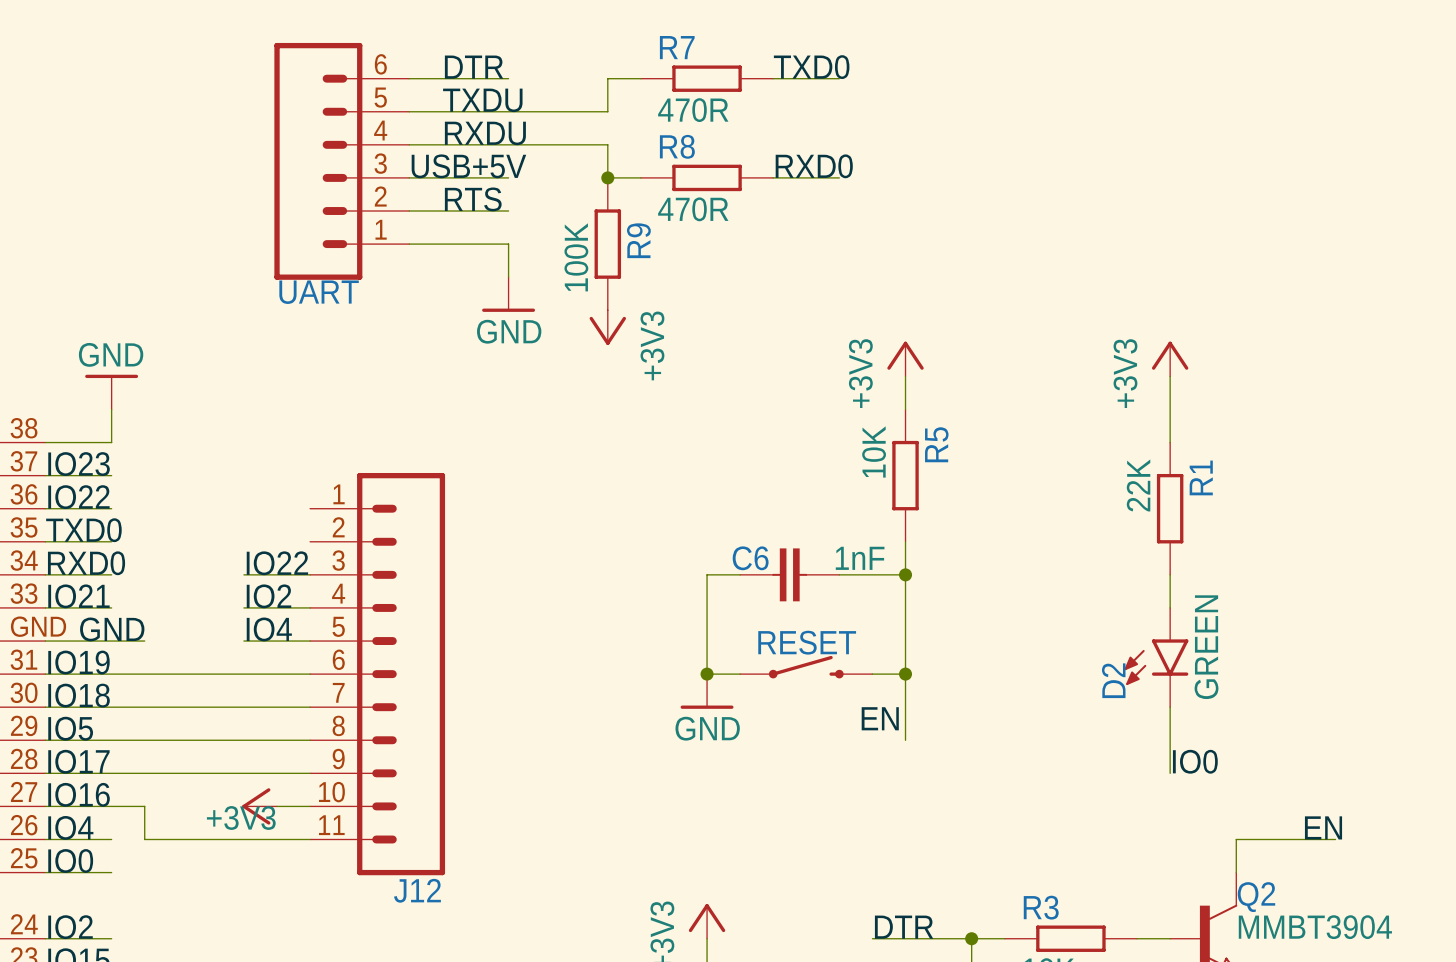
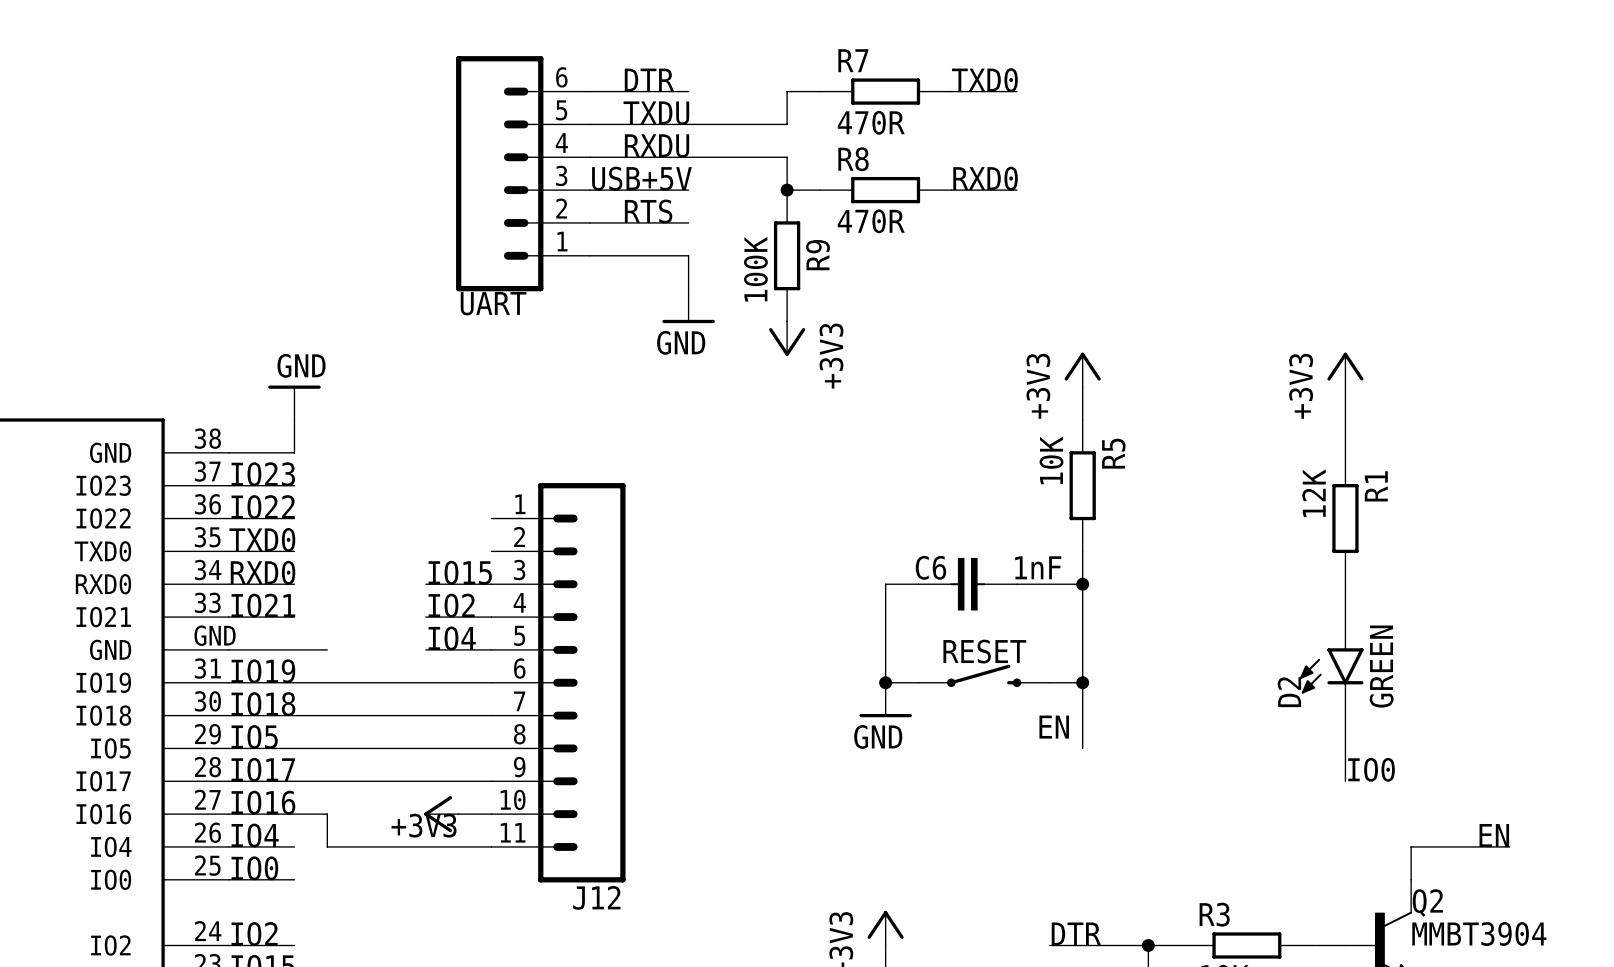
R1 value: 22K (1138, 485) -> 12K (1314, 493)
label: IO22 (277, 563) -> IO15 (460, 572)
label: GND (112, 629) -> none

